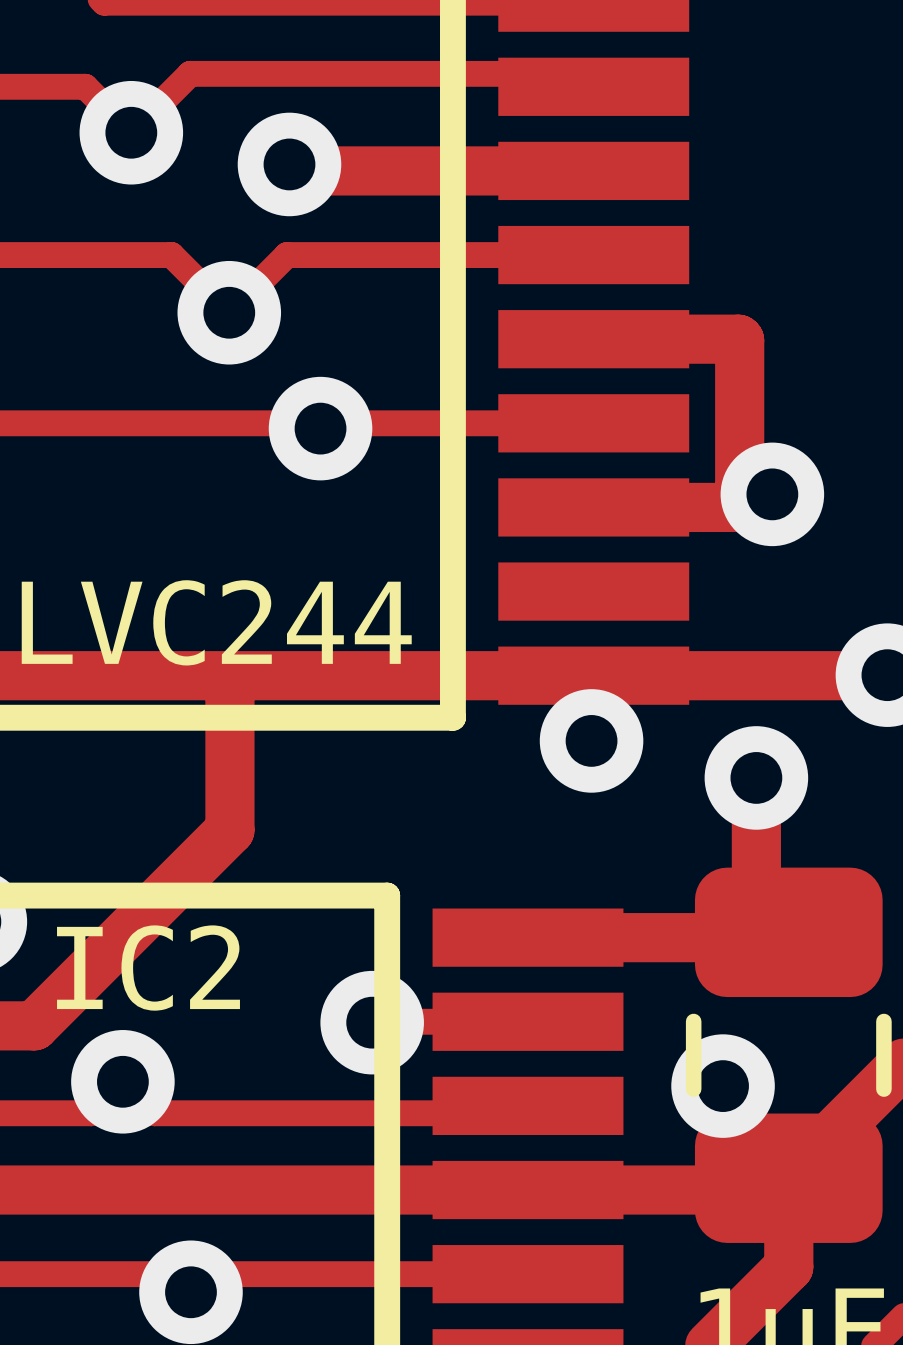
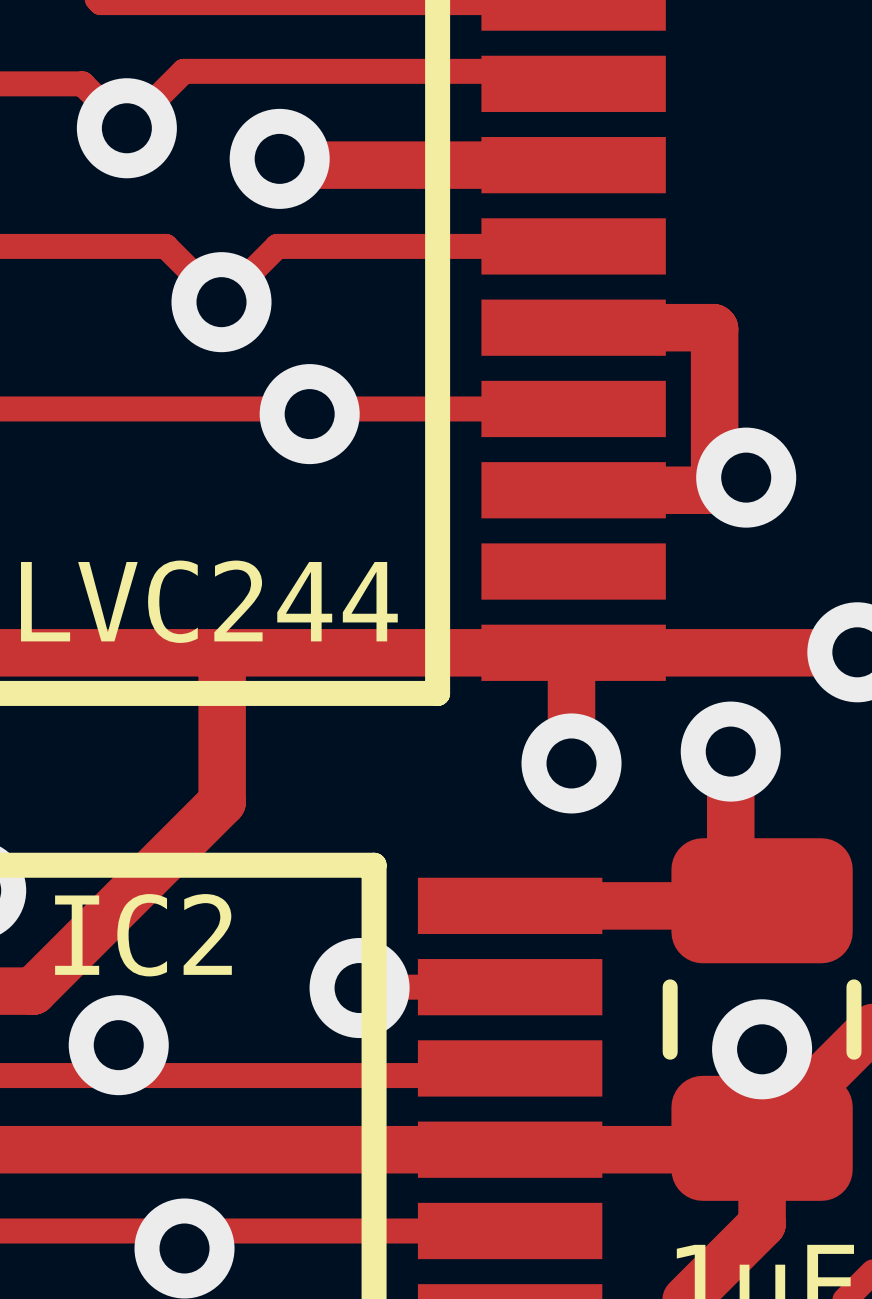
via position: (591, 740) -> (571, 763)
via position: (723, 1086) -> (762, 1049)

